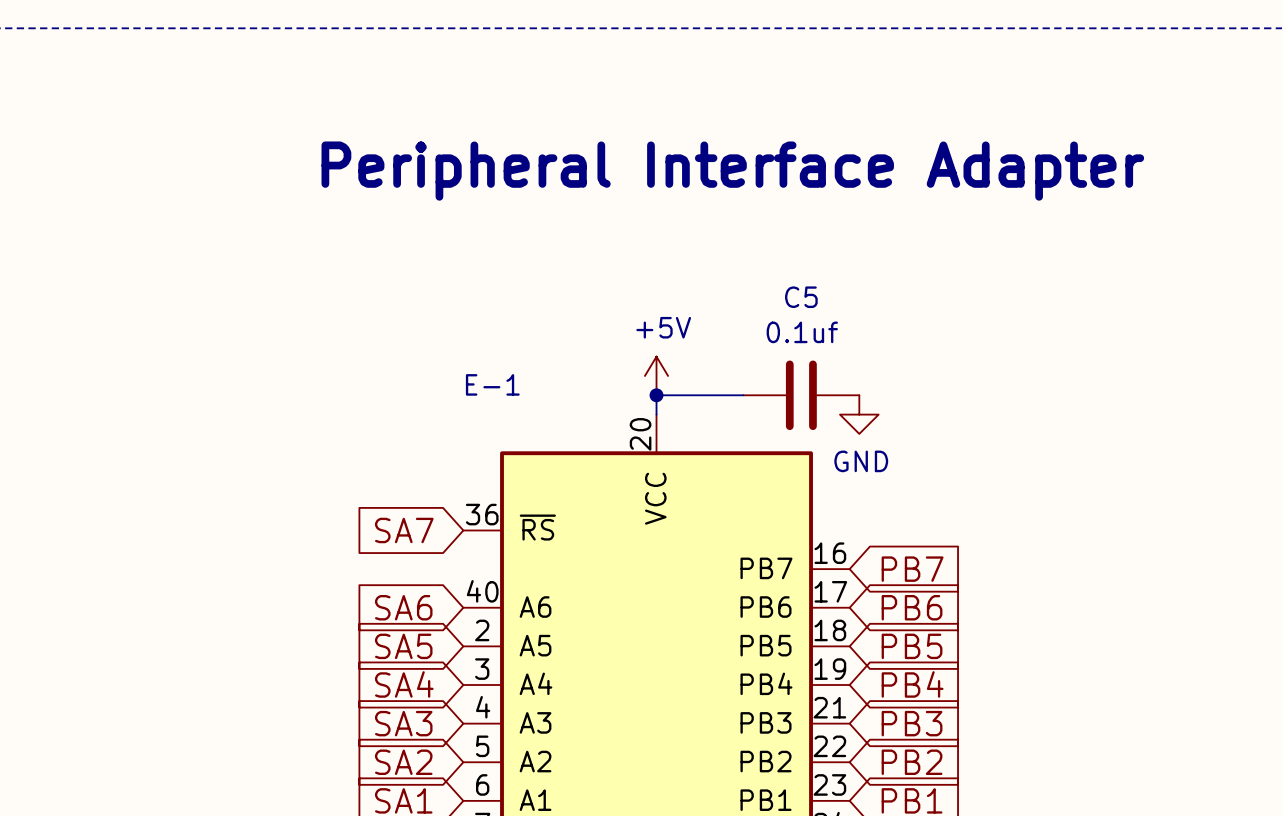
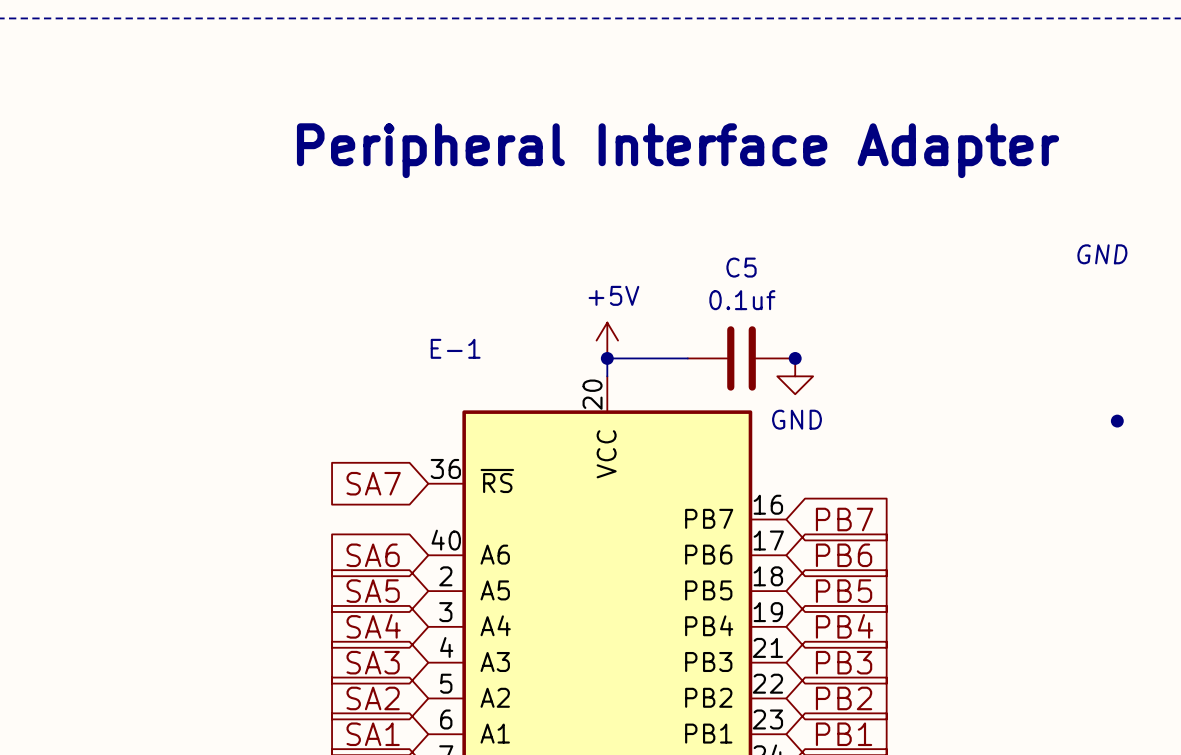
text: none -> GND (1102, 254)
junction: none -> (795, 358)
junction: none -> (1117, 421)

